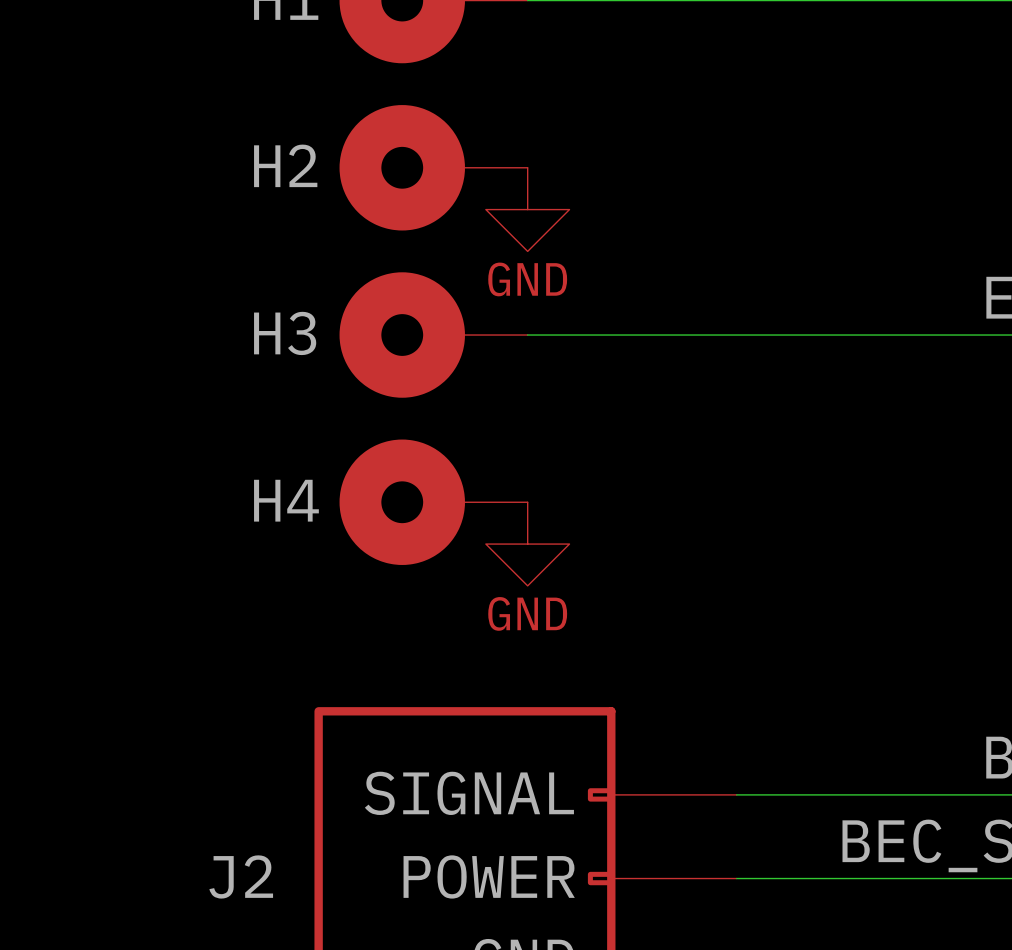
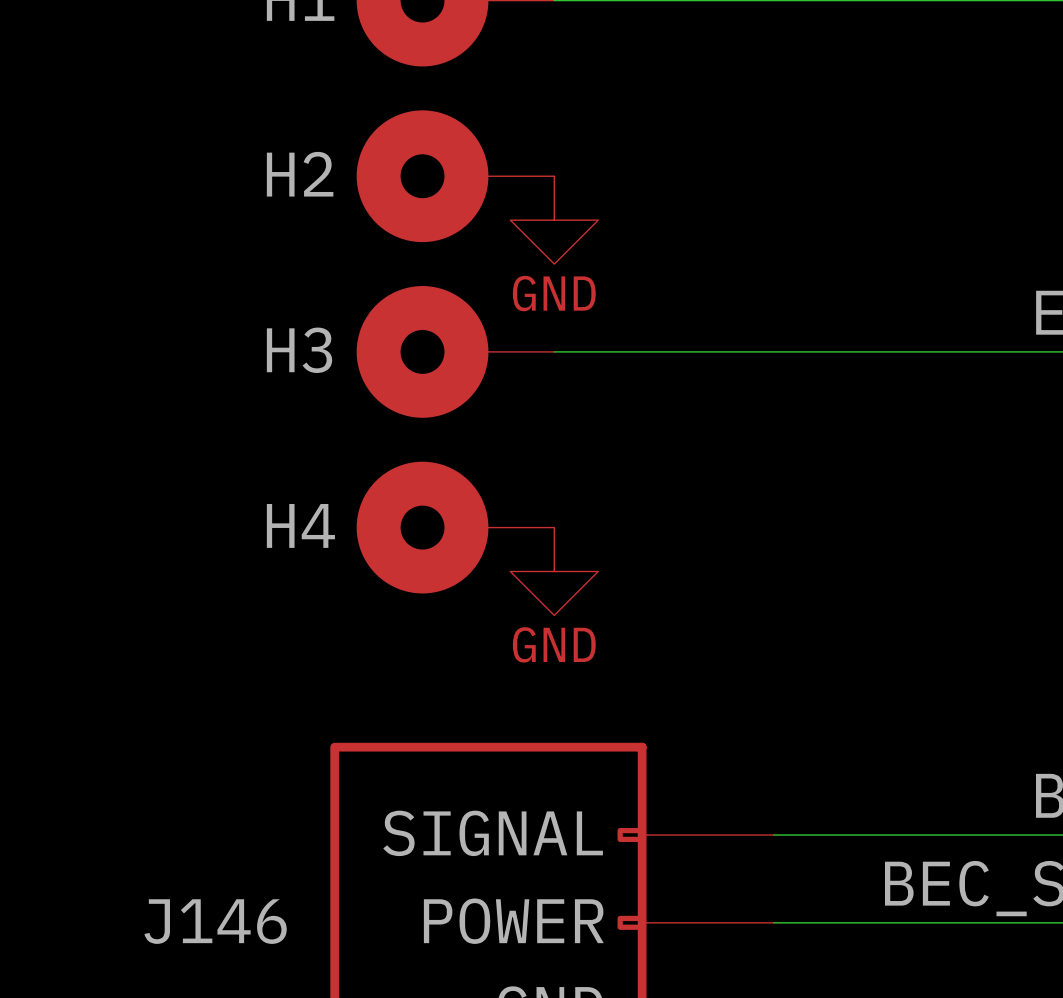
J2 name: J2 (241, 876) -> J146 (215, 921)

